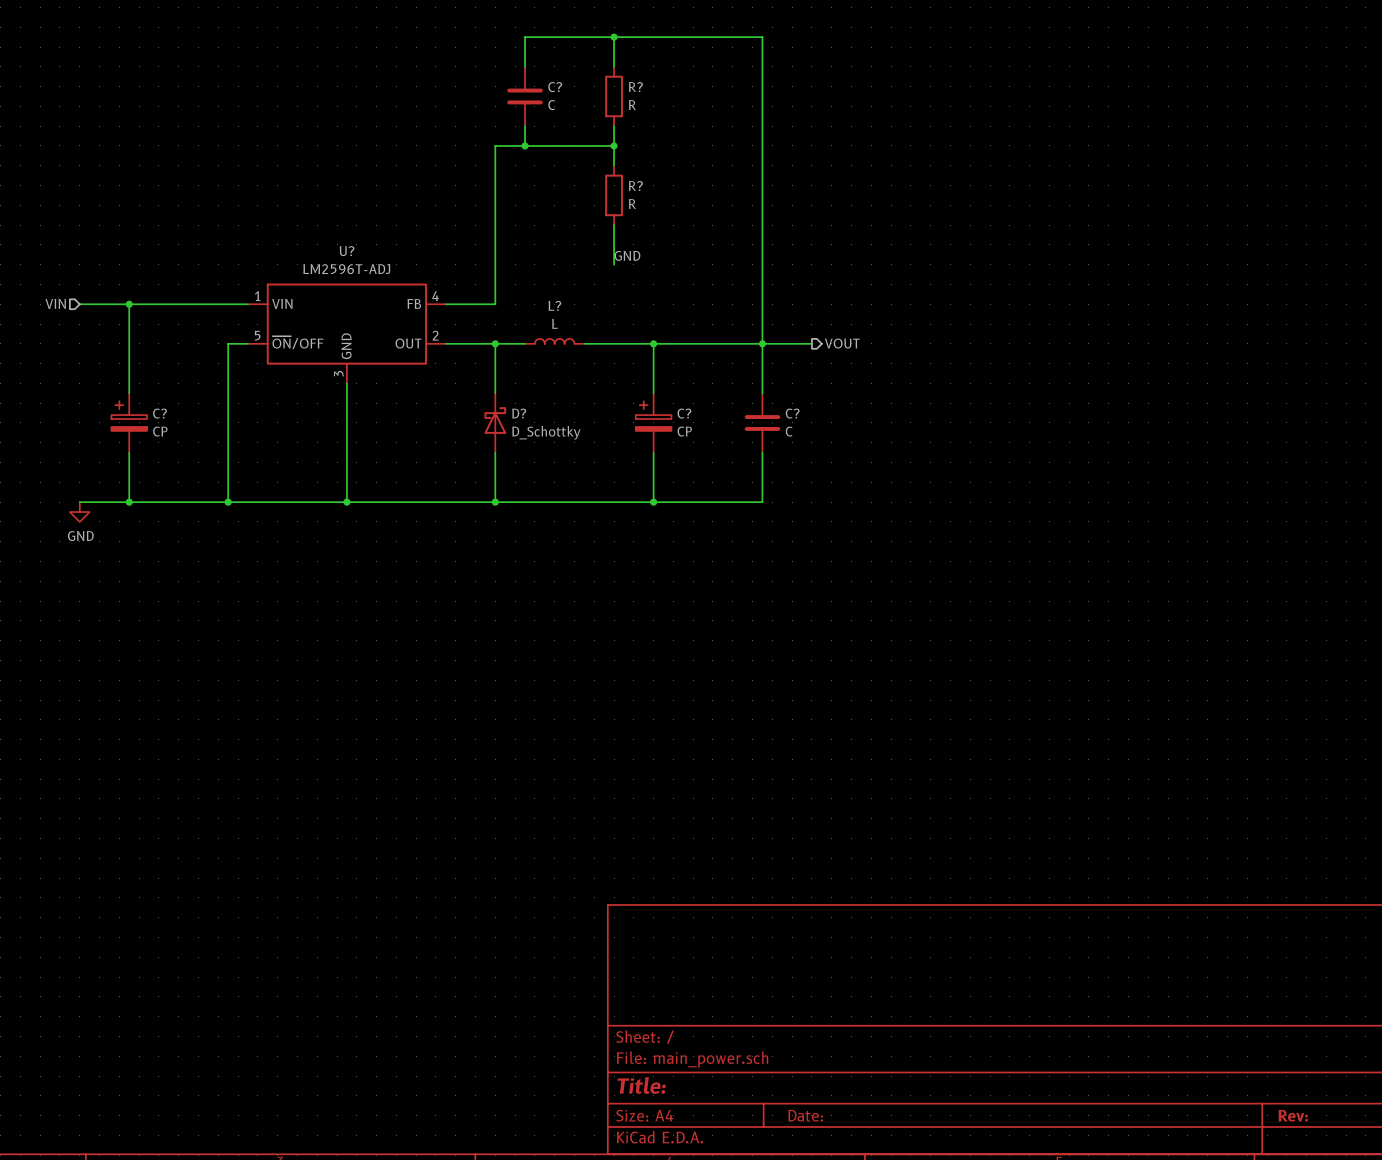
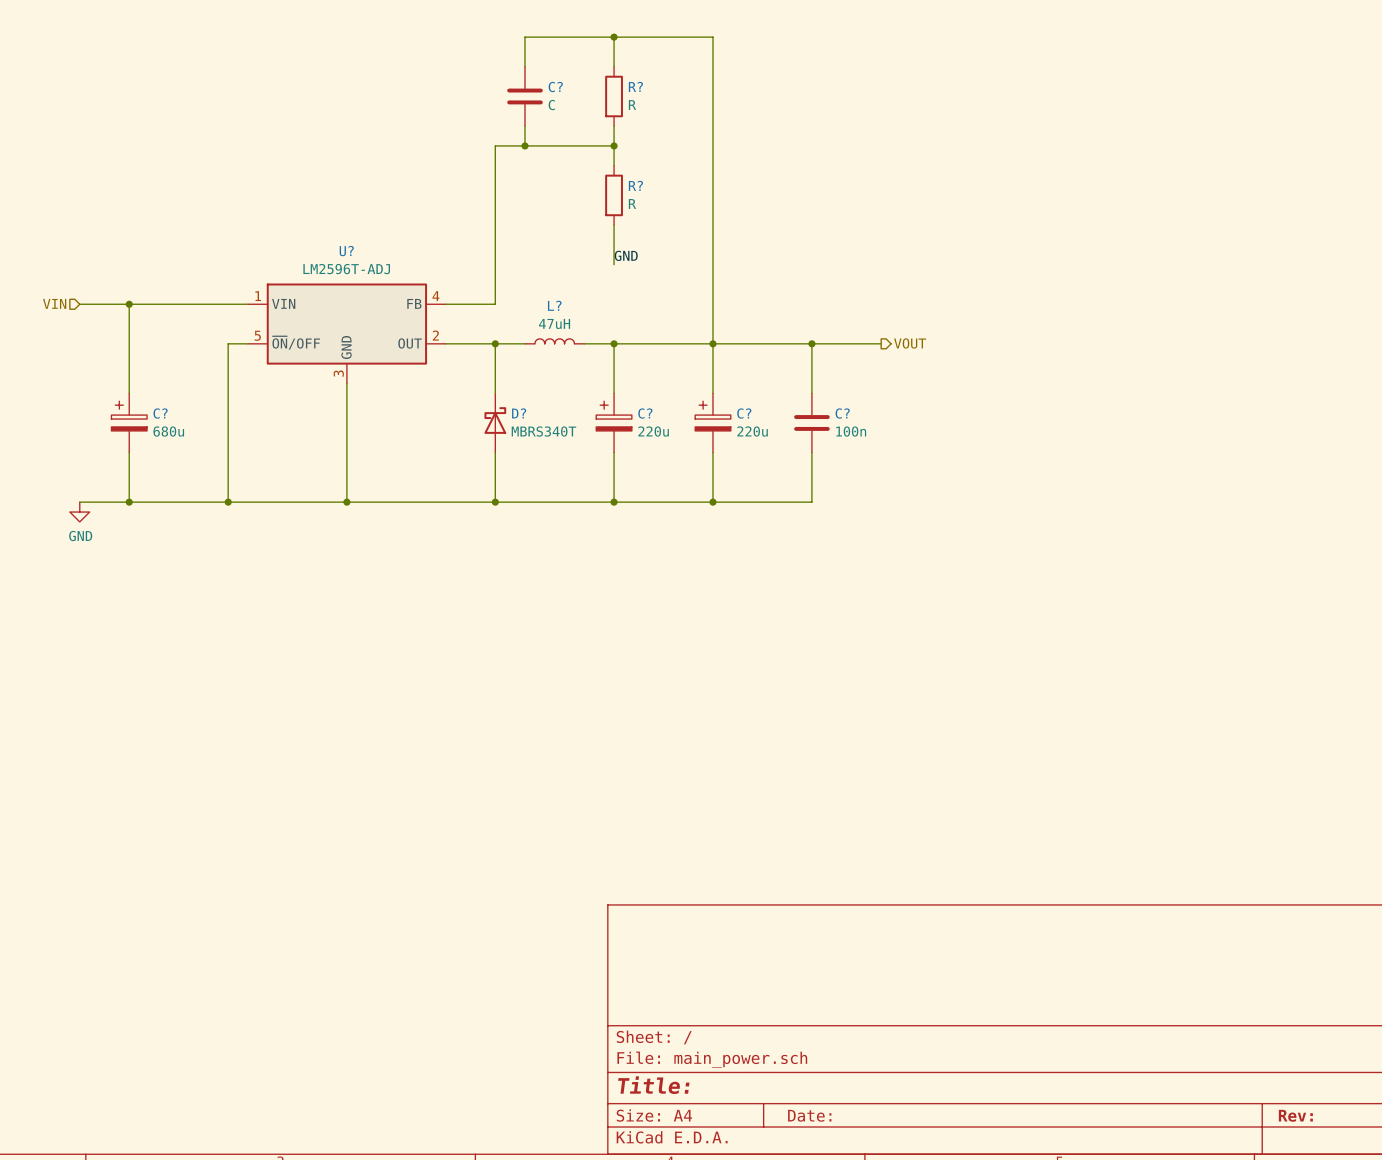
wire: (712, 37) (762, 37) (762, 393) -> (712, 37) (712, 393)
L? value: L (555, 323) -> 47uH (554, 323)
junction: none -> (614, 343)
wire: (653, 343) (653, 393) -> (614, 343) (614, 393)
junction: (653, 343) -> none
junction: none -> (712, 343)
junction: (762, 343) -> none
junction: none -> (811, 343)
hierarchical label position: VOUT (842, 343) -> VOUT (910, 343)
wire: none -> (881, 343) (811, 343) (811, 393)
C?: none -> 220u (614, 422)
C?: CP (653, 422) -> none
C?: none -> 220u (712, 422)
C?: C (762, 422) -> none
C?: none -> 100n (811, 422)
C? value: CP (160, 431) -> 680u (168, 431)
D? value: D_Schottky (546, 432) -> MBRS340T (543, 431)
wire: (653, 452) (653, 502) -> (614, 452) (614, 502)
wire: none -> (712, 452) (712, 502)
wire: (762, 452) (762, 502) -> (811, 452) (811, 502) (762, 502)
junction: none -> (614, 502)
junction: (653, 502) -> none
junction: none -> (712, 502)

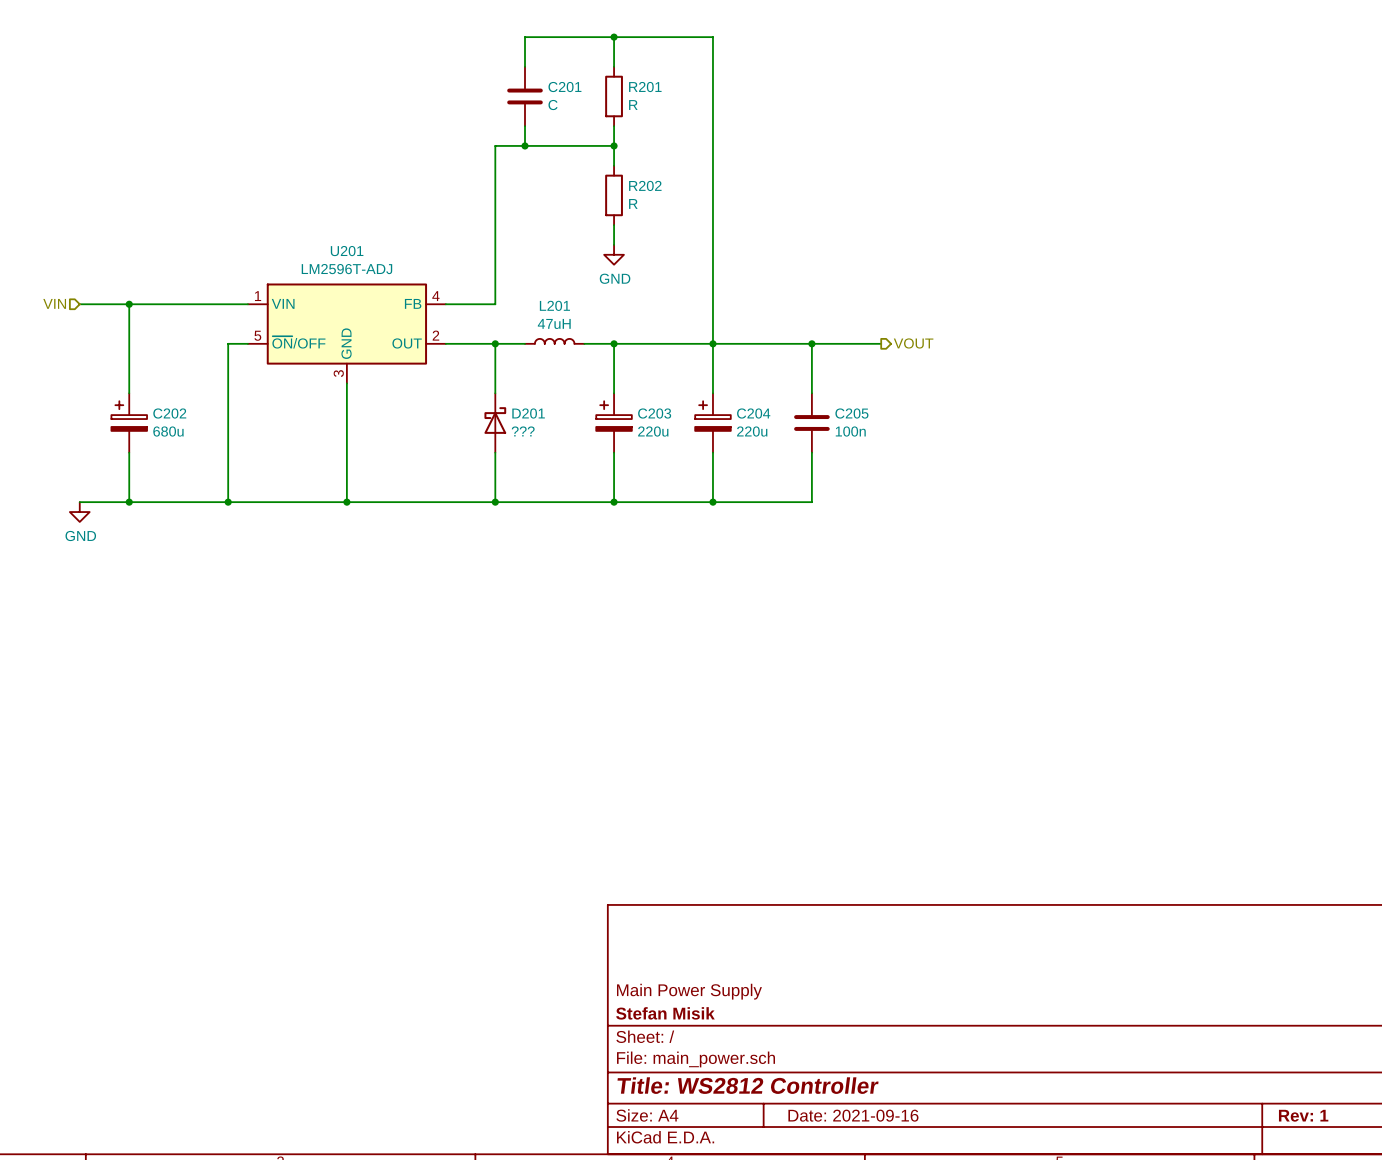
R? name: R? (635, 86) -> R201 (645, 87)
C? name: C? (555, 87) -> C201 (564, 87)
R? name: R? (635, 185) -> R202 (645, 185)
U? name: U? (346, 251) -> U201 (347, 251)
power symbol: none -> GND (614, 254)
label: GND (626, 255) -> none
L? name: L? (554, 305) -> L201 (554, 305)
C? name: C? (160, 413) -> C202 (169, 413)
D? name: D? (519, 413) -> D201 (528, 413)
C? name: C? (645, 413) -> C203 (654, 413)
C? name: C? (744, 413) -> C204 (753, 413)
C? name: C? (842, 413) -> C205 (851, 413)
D? value: MBRS340T (543, 431) -> ??? (523, 431)
title block: none -> Main Power Supply (689, 991)
title block: none -> Stefan Misik (665, 1013)
title block: Title: (653, 1085) -> Title: WS2812 Controller (748, 1085)
title block: Date: (809, 1115) -> Date: 2021-09-16 (853, 1115)
title block: Rev: (1295, 1115) -> Rev: 1 (1303, 1115)

